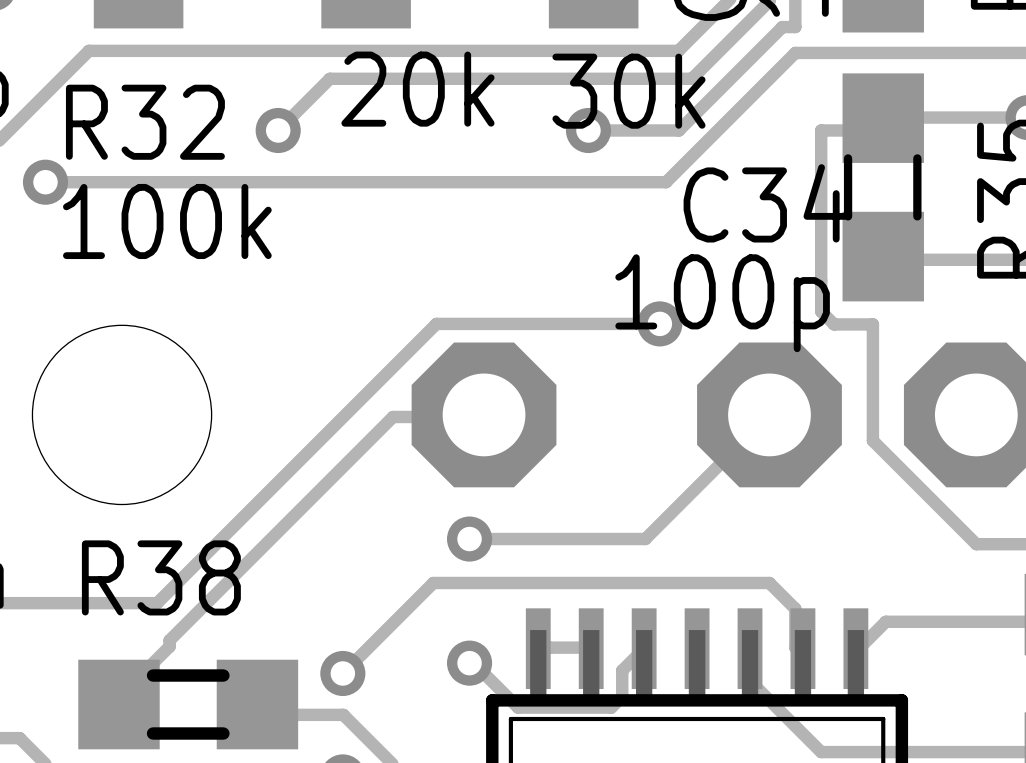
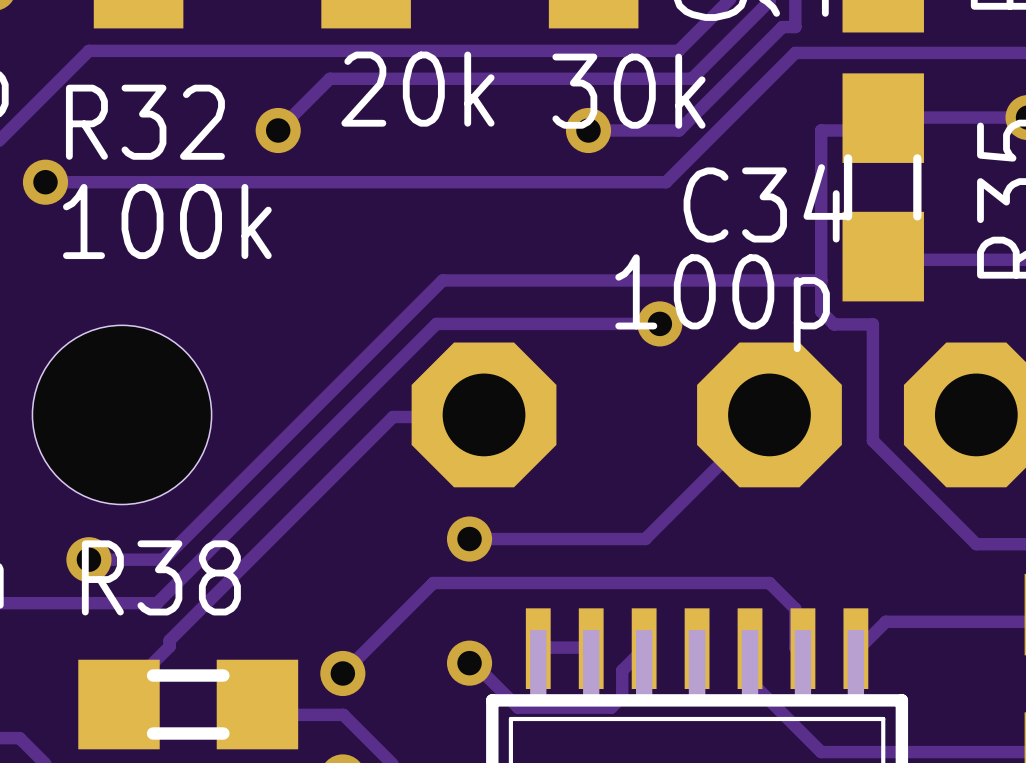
track: none -> (821, 280) (442, 280) (163, 559) (88, 559)
via: none -> (88, 559)

